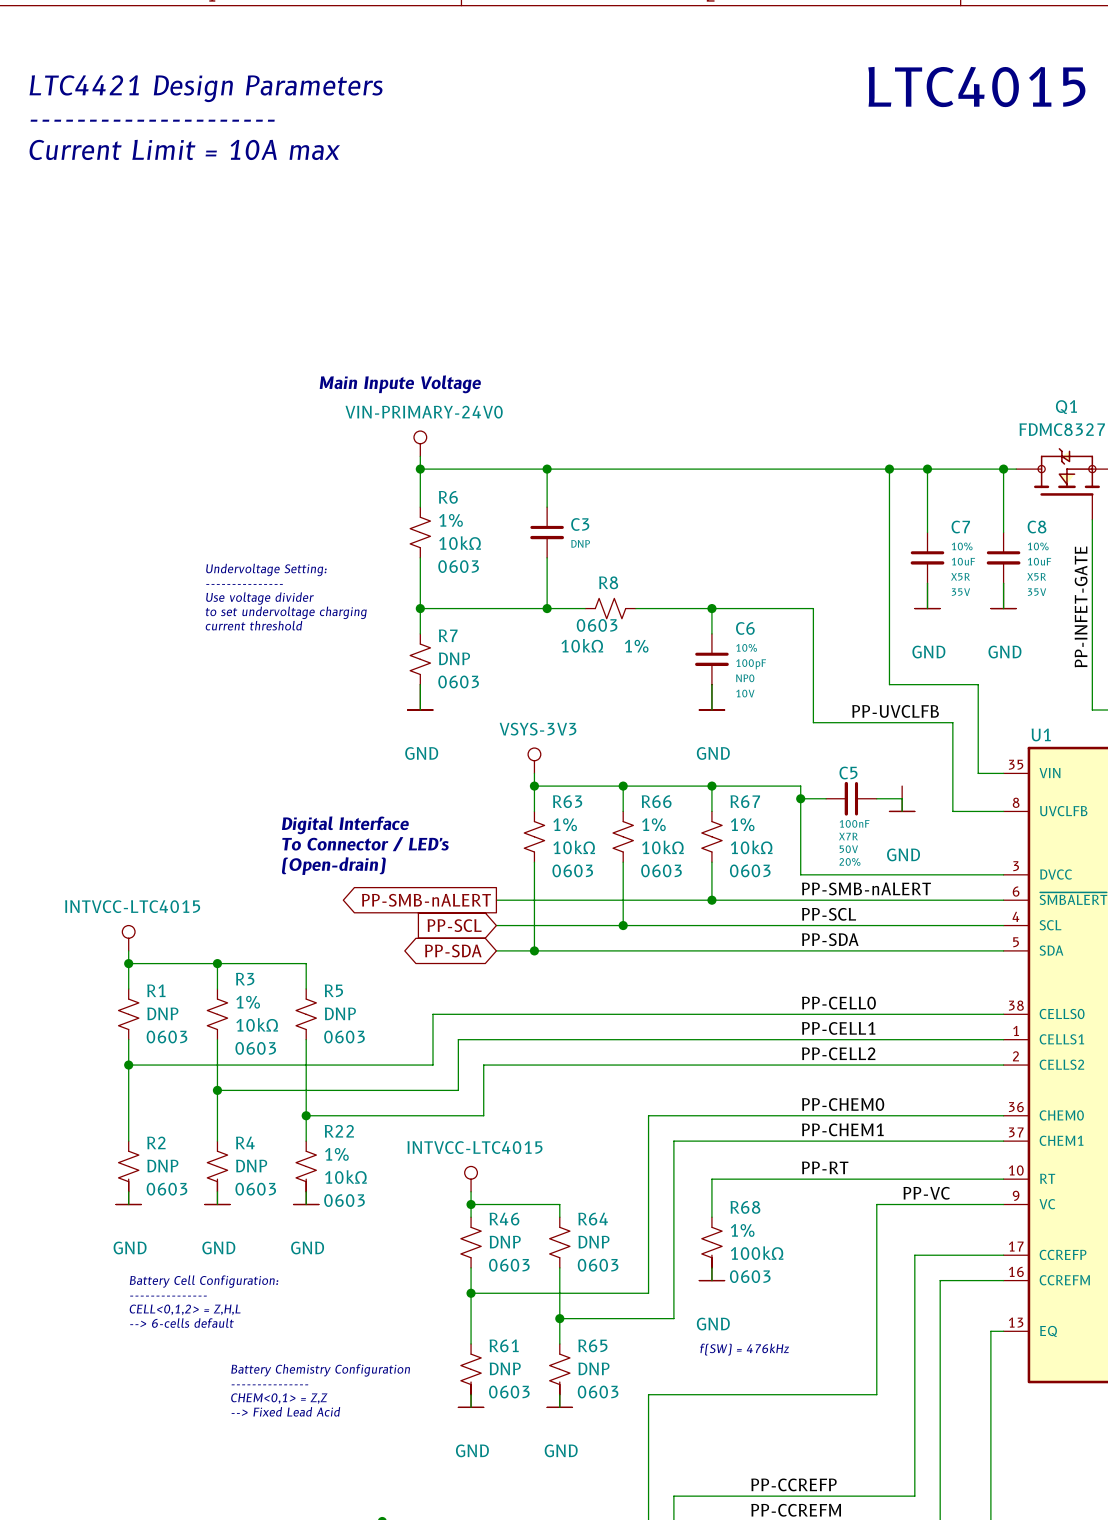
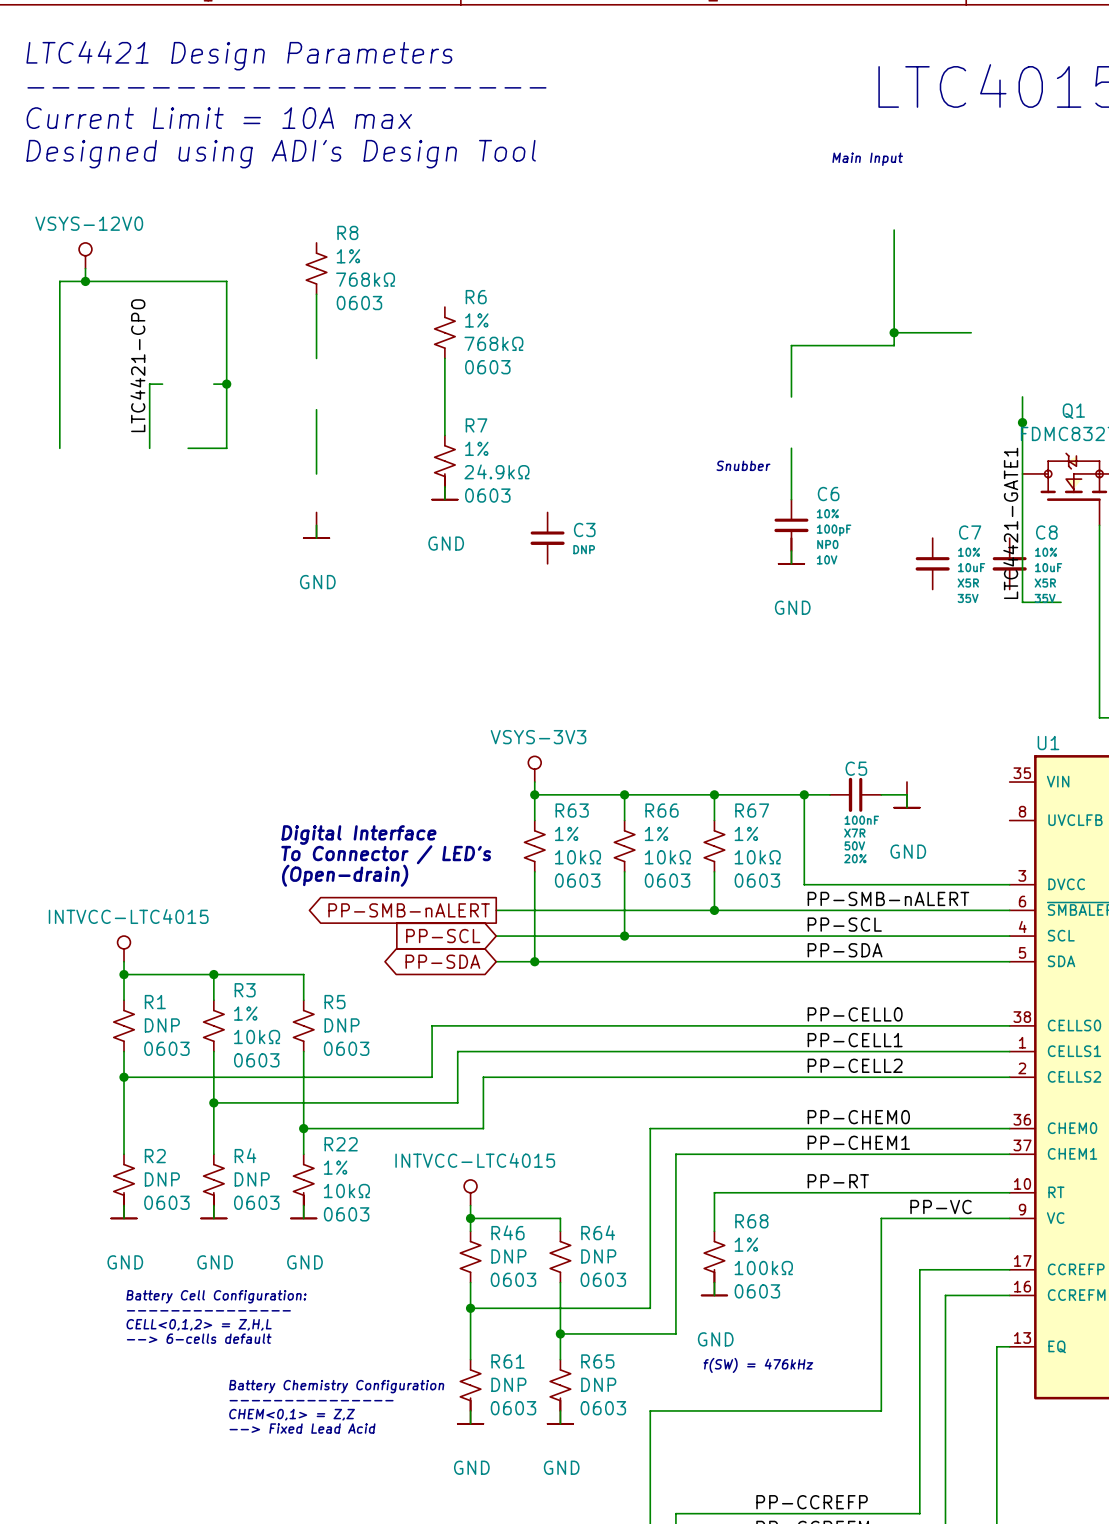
text: none -> LTC4421 Design Parameters (239, 55)
text: LTC4421 Design Parameters (206, 88) -> --------------------- (286, 87)
text: --------------------- (152, 120) -> Current Limit = 10A max (219, 118)
text: Current Limit = 10A max (184, 149) -> Designed using ADI's Design Tool (281, 154)
text: none -> Main Input (867, 159)
wire: none -> (894, 230) (894, 345) (791, 345) (791, 396)
power symbol: none -> VSYS-12V0 (85, 255)
wire: none -> (85, 268) (85, 281)
junction: none -> (85, 281)
wire: none -> (316, 294) (316, 358)
wire: none -> (894, 332) (971, 332)
junction: none -> (894, 332)
label: none -> LTC4421-CPO (137, 365)
wire: none -> (162, 384) (149, 384) (149, 448)
wire: none -> (213, 384) (226, 384)
junction: none -> (226, 384)
text: Main Inpute Voltage (400, 384) -> none
wire: none -> (1022, 396) (1022, 602) (1061, 602)
wire: none -> (316, 409) (316, 473)
junction: none -> (1022, 422)
wire: none -> (59, 448) (59, 281) (226, 281) (226, 448) (188, 448)
power symbol: VIN-PRIMARY-24V0 (420, 443) -> none
wire: none -> (791, 448) (791, 499)
R7 text: none -> 1% (476, 448)
wire: (420, 456) (420, 507) -> none
text: none -> Snubber (743, 465)
wire: (420, 469) (1016, 469) -> none
junction: (420, 469) -> none
wire: (547, 469) (547, 507) -> none
junction: (547, 469) -> none
wire: (889, 469) (889, 684) (978, 684) (978, 773) (1003, 773) -> none
junction: (889, 469) -> none
wire: (927, 469) (927, 532) -> none
junction: (927, 469) -> none
wire: (1003, 469) (1003, 532) -> none
junction: (1003, 469) -> none
wire: none -> (444, 486) (444, 499)
power symbol: none -> GND (444, 486)
wire: none -> (316, 525) (316, 538)
power symbol: none -> GND (316, 525)
label: none -> LTC4421-GATE1 (1010, 523)
R6 position: (420, 532) -> (444, 332)
R6 text: 10kΩ (460, 543) -> 768kΩ (493, 343)
wire: none -> (791, 550) (791, 563)
power symbol: none -> GND (791, 550)
wire: (420, 557) (420, 633) -> (444, 358) (444, 435)
wire: (547, 557) (547, 608) -> none
text: Undervoltage Setting: (266, 569) -> none
R8 name position: R8 (608, 582) -> R8 (347, 232)
wire: (927, 583) (927, 608) -> none
wire: (1003, 583) (1003, 608) -> none
text: --------------- (244, 584) -> none
power symbol: GND (927, 595) -> none
power symbol: GND (1003, 595) -> none
text: Use voltage divider (260, 598) -> none
label: PP-INFET-GATE (1081, 606) -> none
wire: (420, 608) (585, 608) -> none
junction: (420, 608) -> none
junction: (547, 608) -> none
R8 rotation: 0° (610, 608) -> 90° clockwise (316, 268)
R8 position: (610, 608) -> (316, 268)
wire: (635, 608) (813, 608) (813, 722) (952, 722) (952, 811) (1003, 811) -> none
wire: (711, 608) (711, 633) -> none
junction: (711, 608) -> none
text: to set undervoltage charging (286, 612) -> none
text: current threshold (253, 625) -> none
R8 text position: 0603 (597, 625) -> 0603 (359, 303)
R7 name position: R7 (448, 635) -> R7 (476, 425)
R8 text: 10kΩ (582, 645) -> 768kΩ (365, 279)
R8 text position: 1% (636, 646) -> 1% (348, 256)
R7 text: DNP (454, 658) -> 24.9kΩ (496, 471)
R7 position: (420, 659) -> (444, 461)
C6 position: (711, 659) -> (791, 525)
R7 text position: 0603 (458, 681) -> 0603 (487, 495)
wire: (420, 684) (420, 710) -> none
wire: (711, 684) (711, 710) -> none
power symbol: GND (420, 697) -> none
power symbol: GND (711, 697) -> none
label: PP-UVCLFB (895, 711) -> none
wire: (800, 798) (826, 798) -> (804, 794) (829, 794)
junction position: (800, 798) -> (804, 794)
C5 position: (851, 798) -> (855, 794)
wire: (876, 798) (902, 798) (902, 811) -> (881, 794) (906, 794) (906, 807)
power symbol position: GND (902, 798) -> GND (906, 794)

